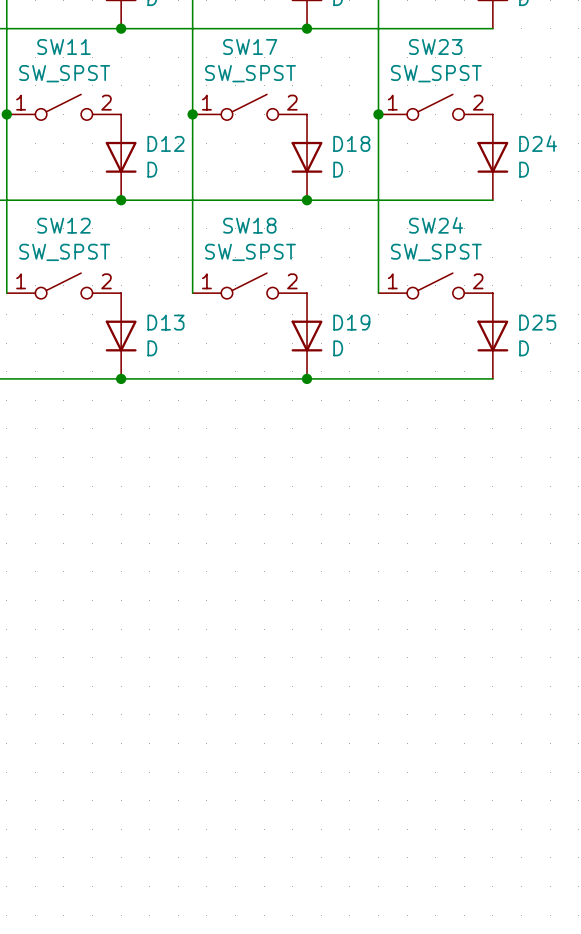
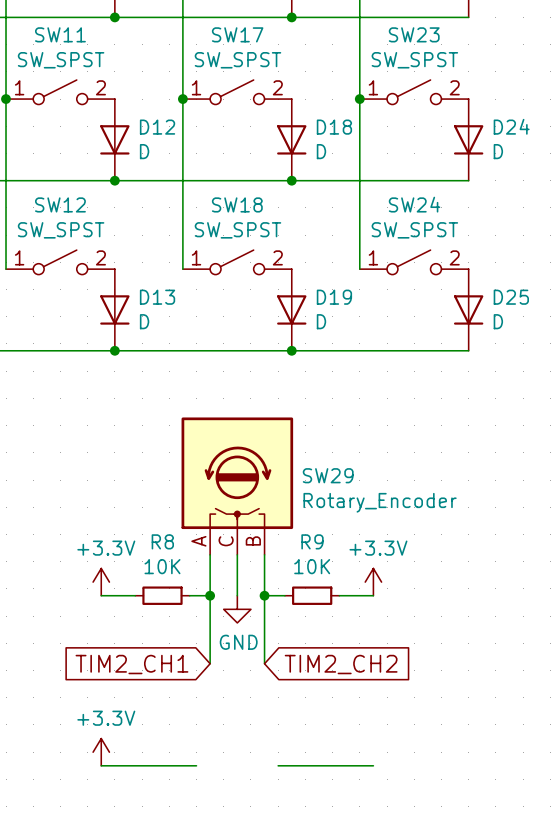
SW29: none -> Rotary_Encoder (237, 486)
wire: none -> (210, 554) (210, 663)
wire: none -> (237, 554) (237, 595)
wire: none -> (264, 554) (264, 663)
power symbol: none -> +3.3V (101, 582)
power symbol: none -> +3.3V (373, 582)
wire: none -> (101, 595) (135, 595)
R8: none -> 10K (162, 595)
wire: none -> (189, 595) (210, 595)
junction: none -> (210, 595)
wire: none -> (264, 595) (284, 595)
junction: none -> (264, 595)
R9: none -> 10K (312, 595)
wire: none -> (339, 595) (373, 595)
power symbol: none -> GND (237, 609)
global label: none -> TIM2_CH1 (131, 664)
global label: none -> TIM2_CH2 (341, 664)
power symbol: none -> +3.3V (101, 752)
wire: none -> (101, 765) (196, 765)
wire: none -> (278, 765) (373, 765)

